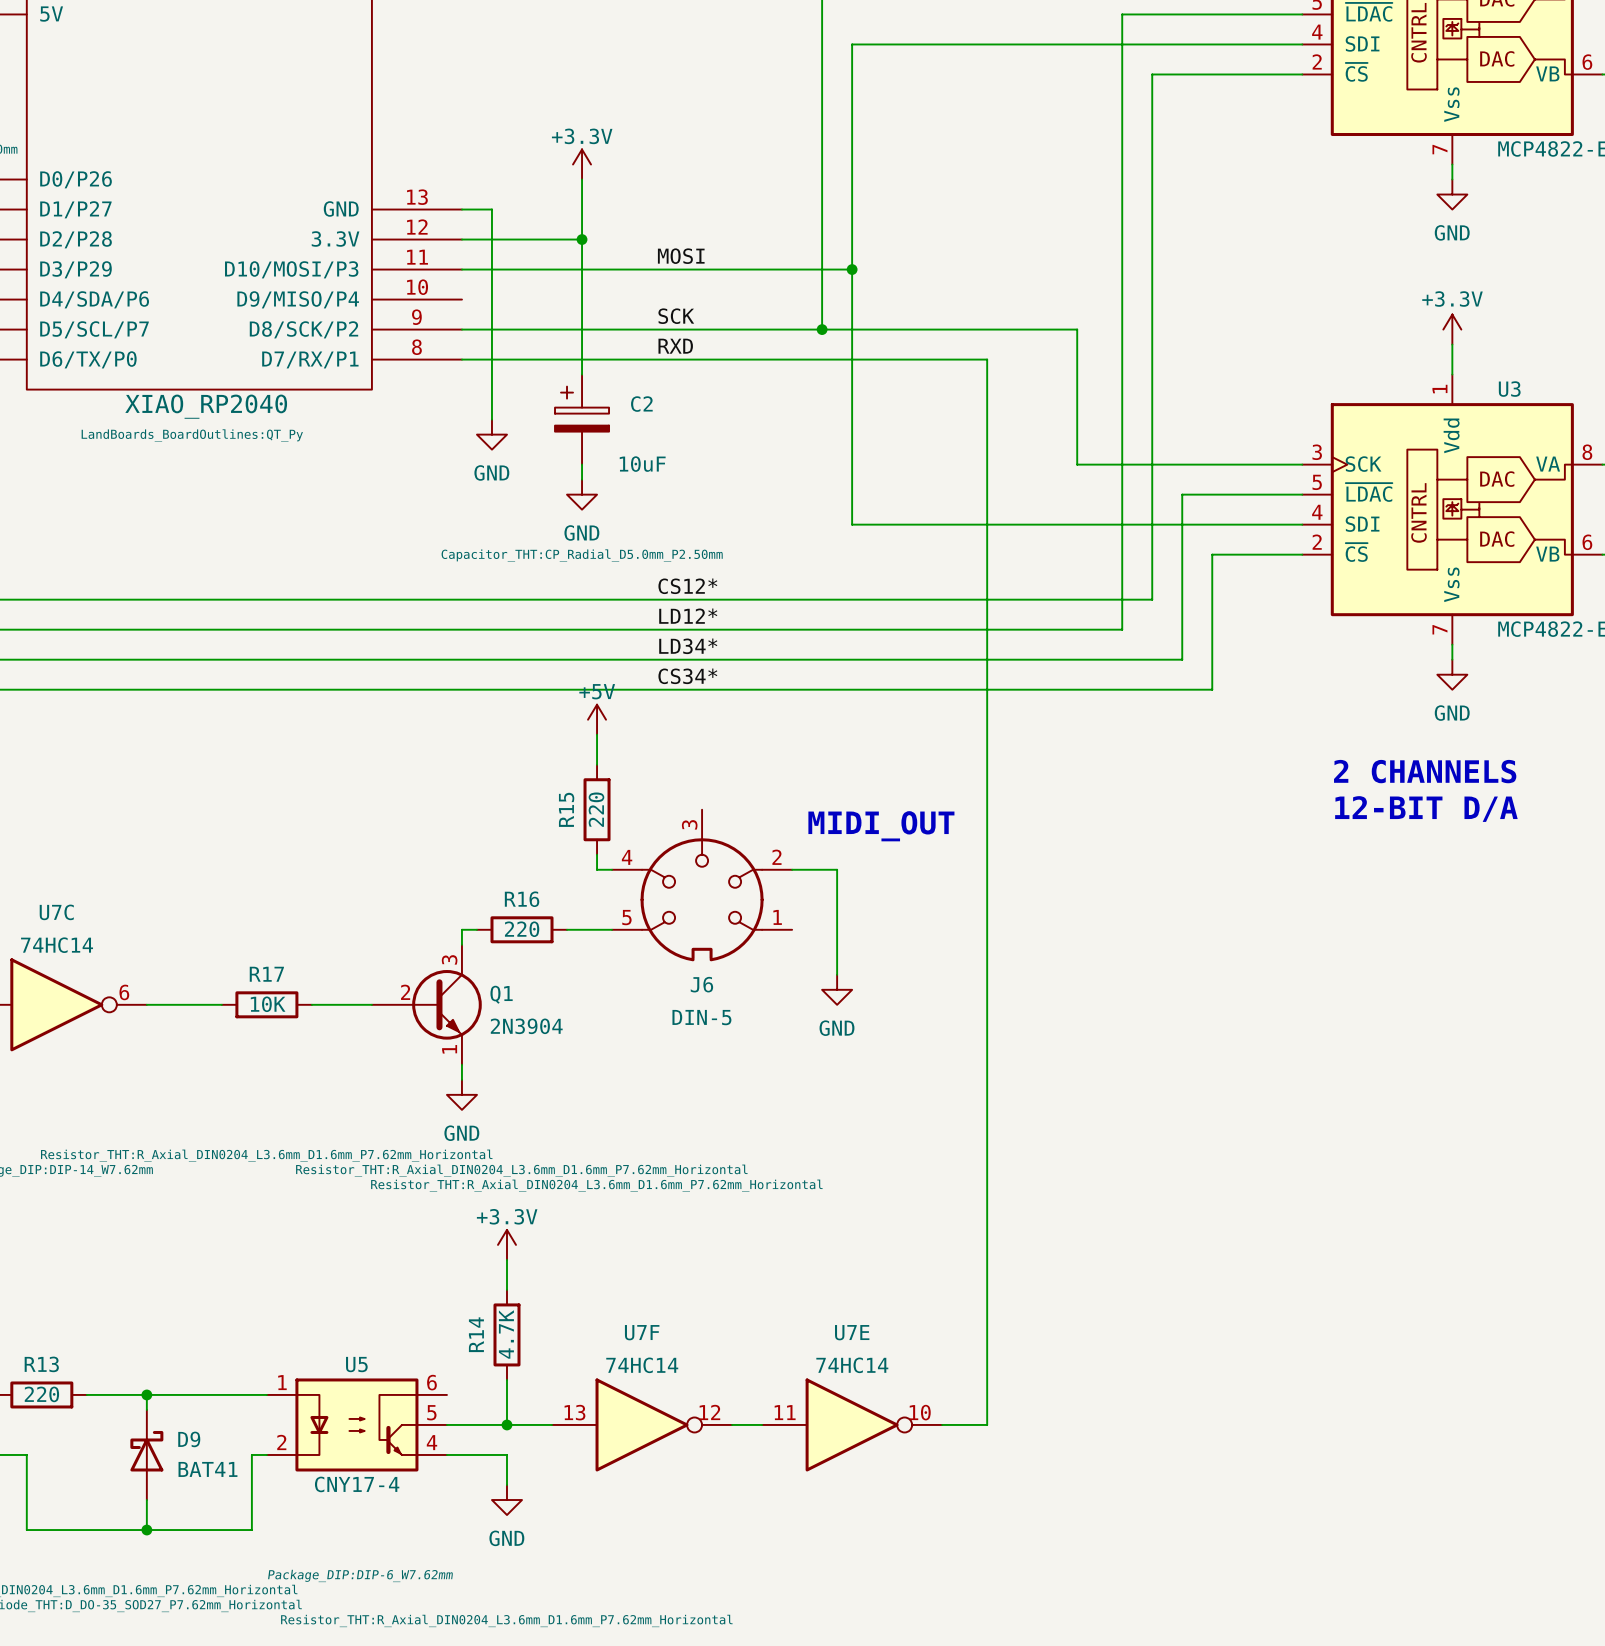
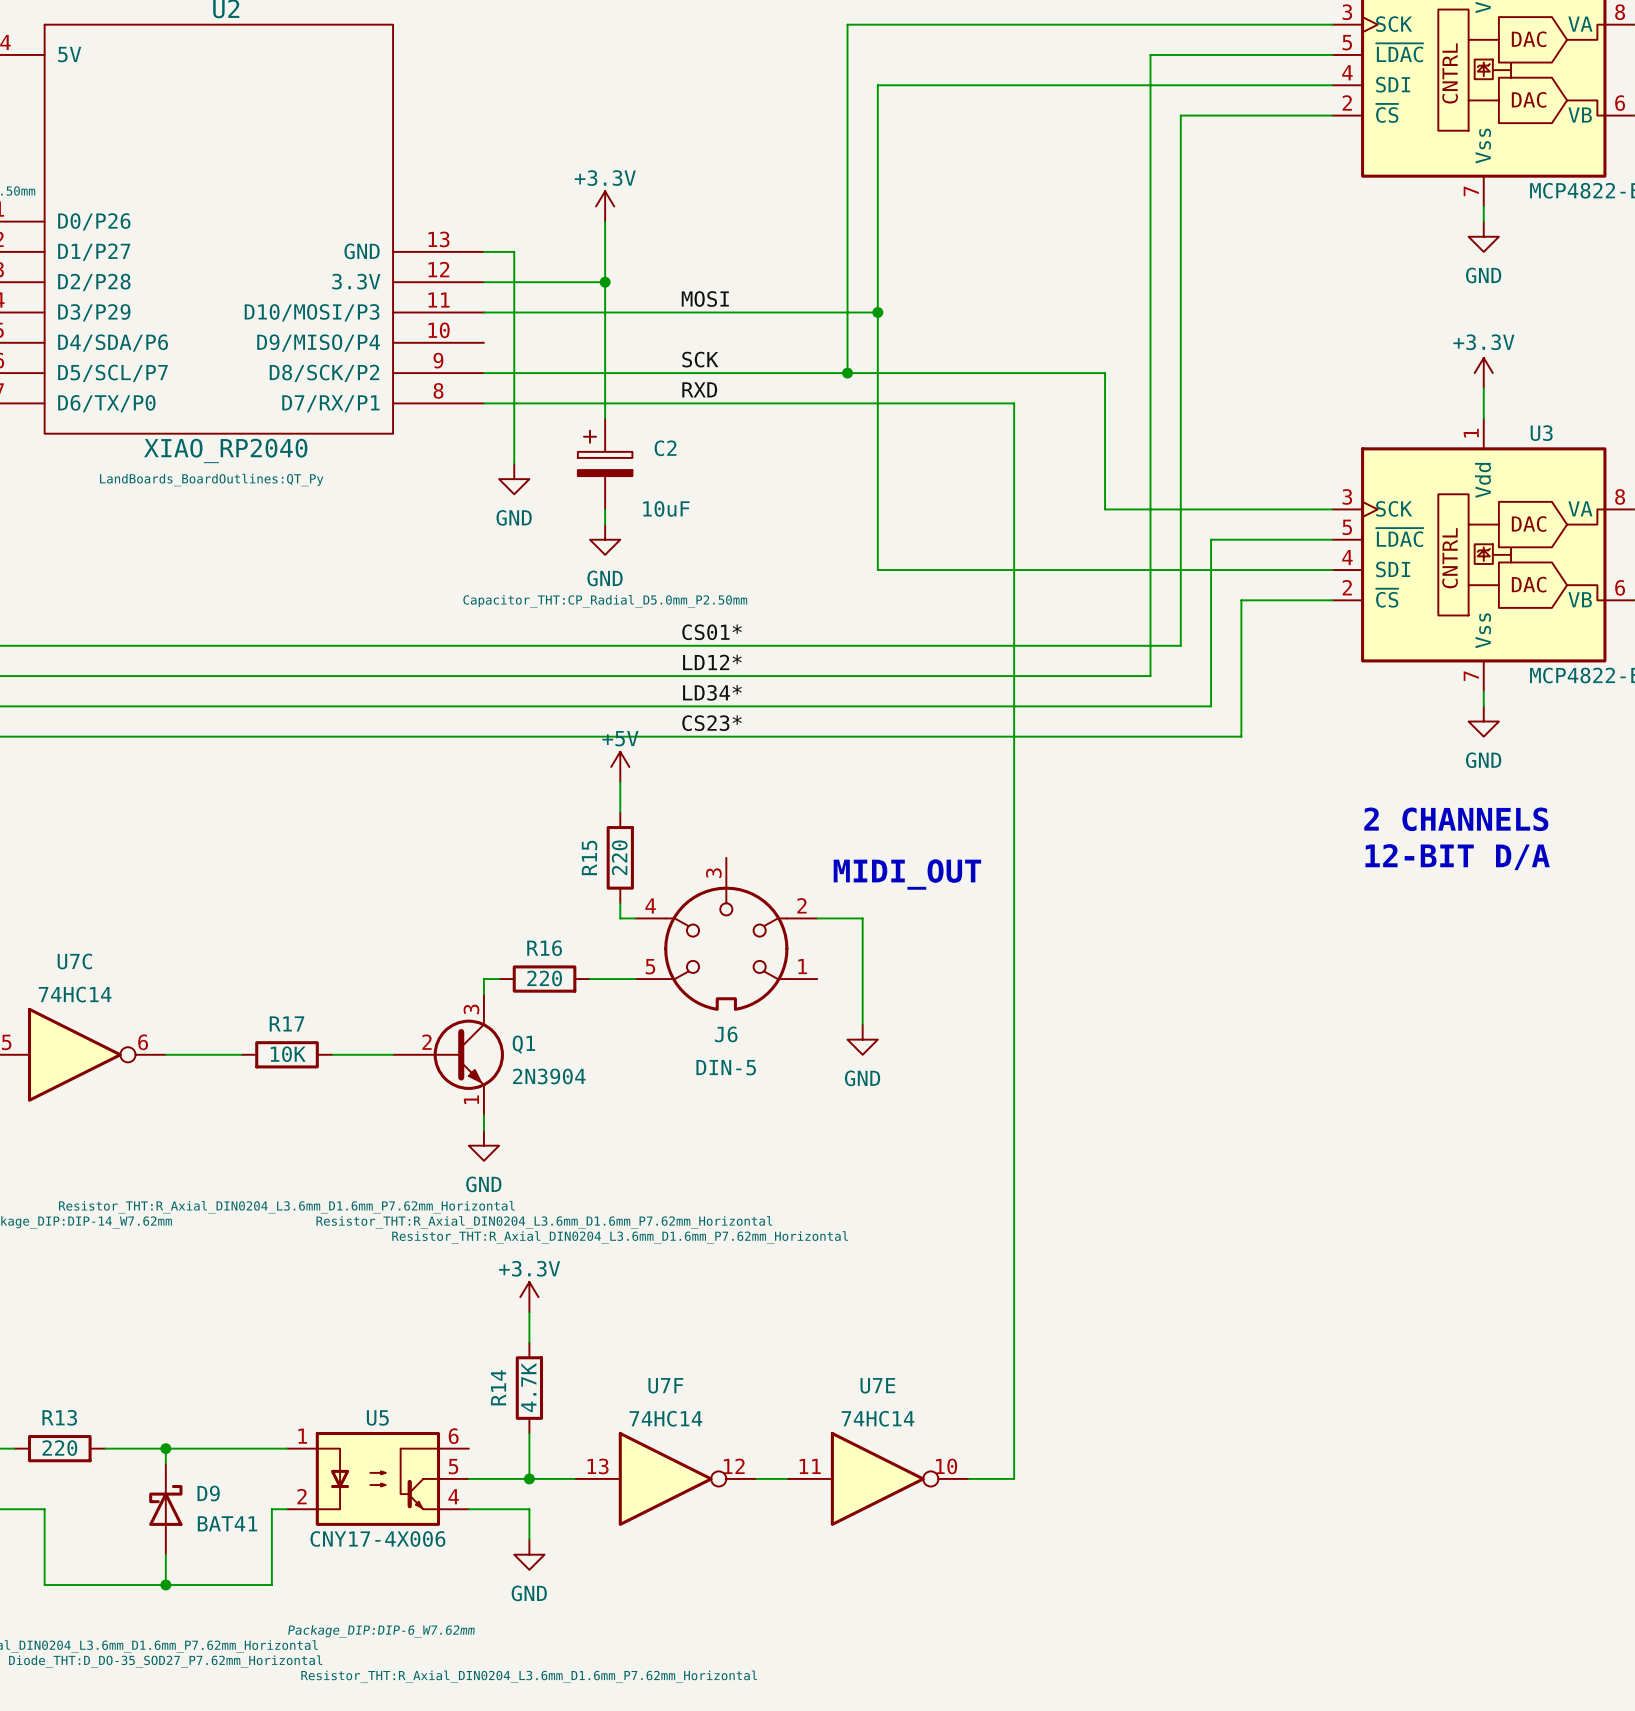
label: CS12* (687, 586) -> CS01* (712, 632)
label: CS34* (687, 676) -> CS23* (712, 723)
U5 value: CNY17-4 (357, 1484) -> CNY17-4X006 (377, 1538)

